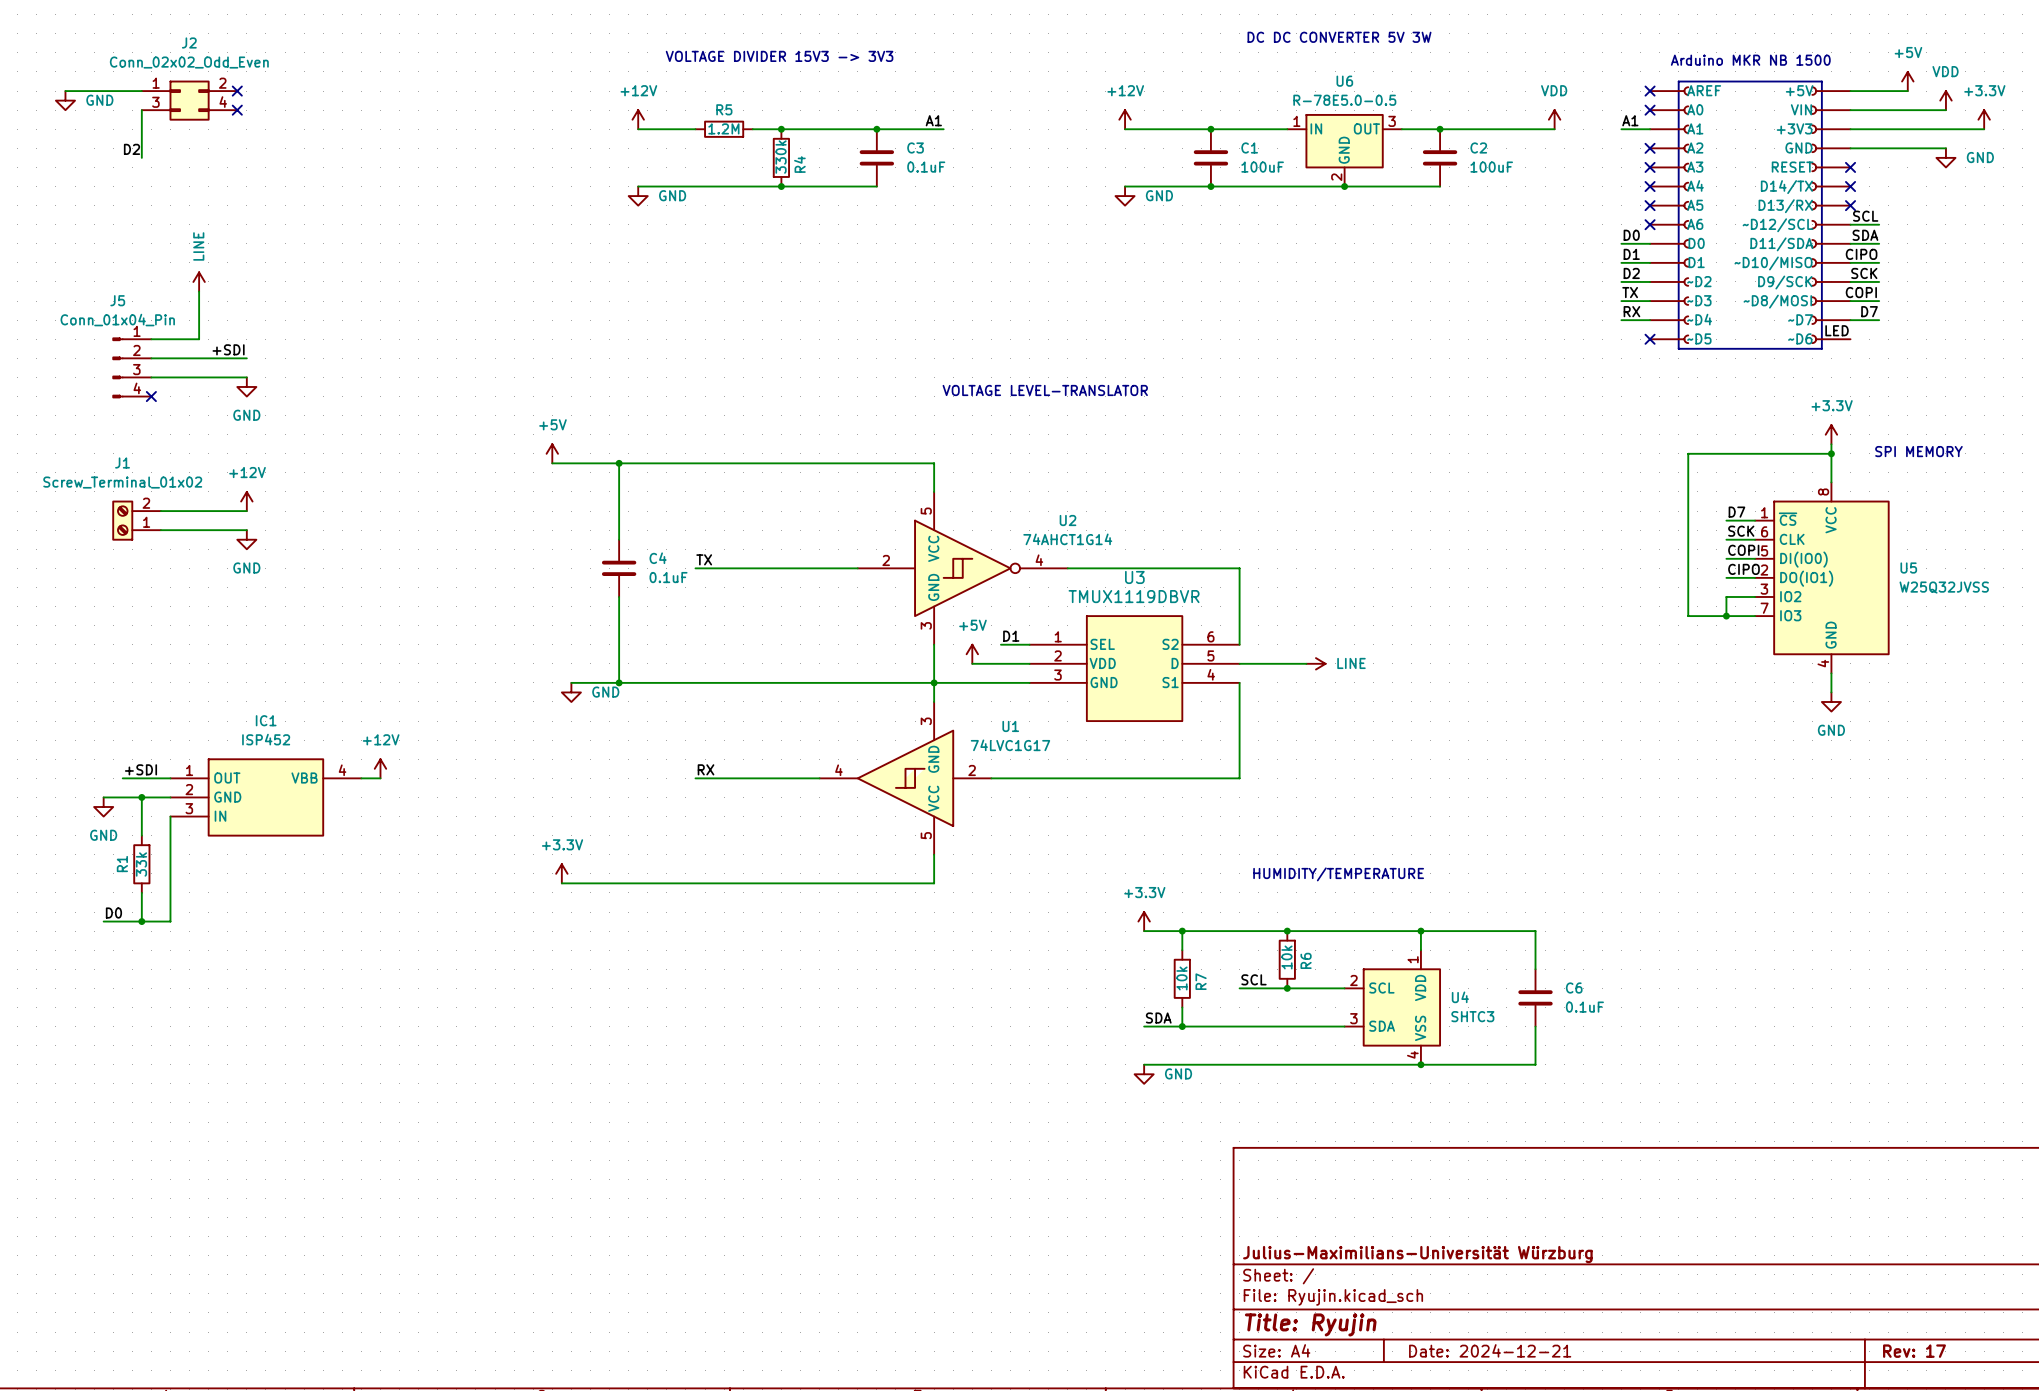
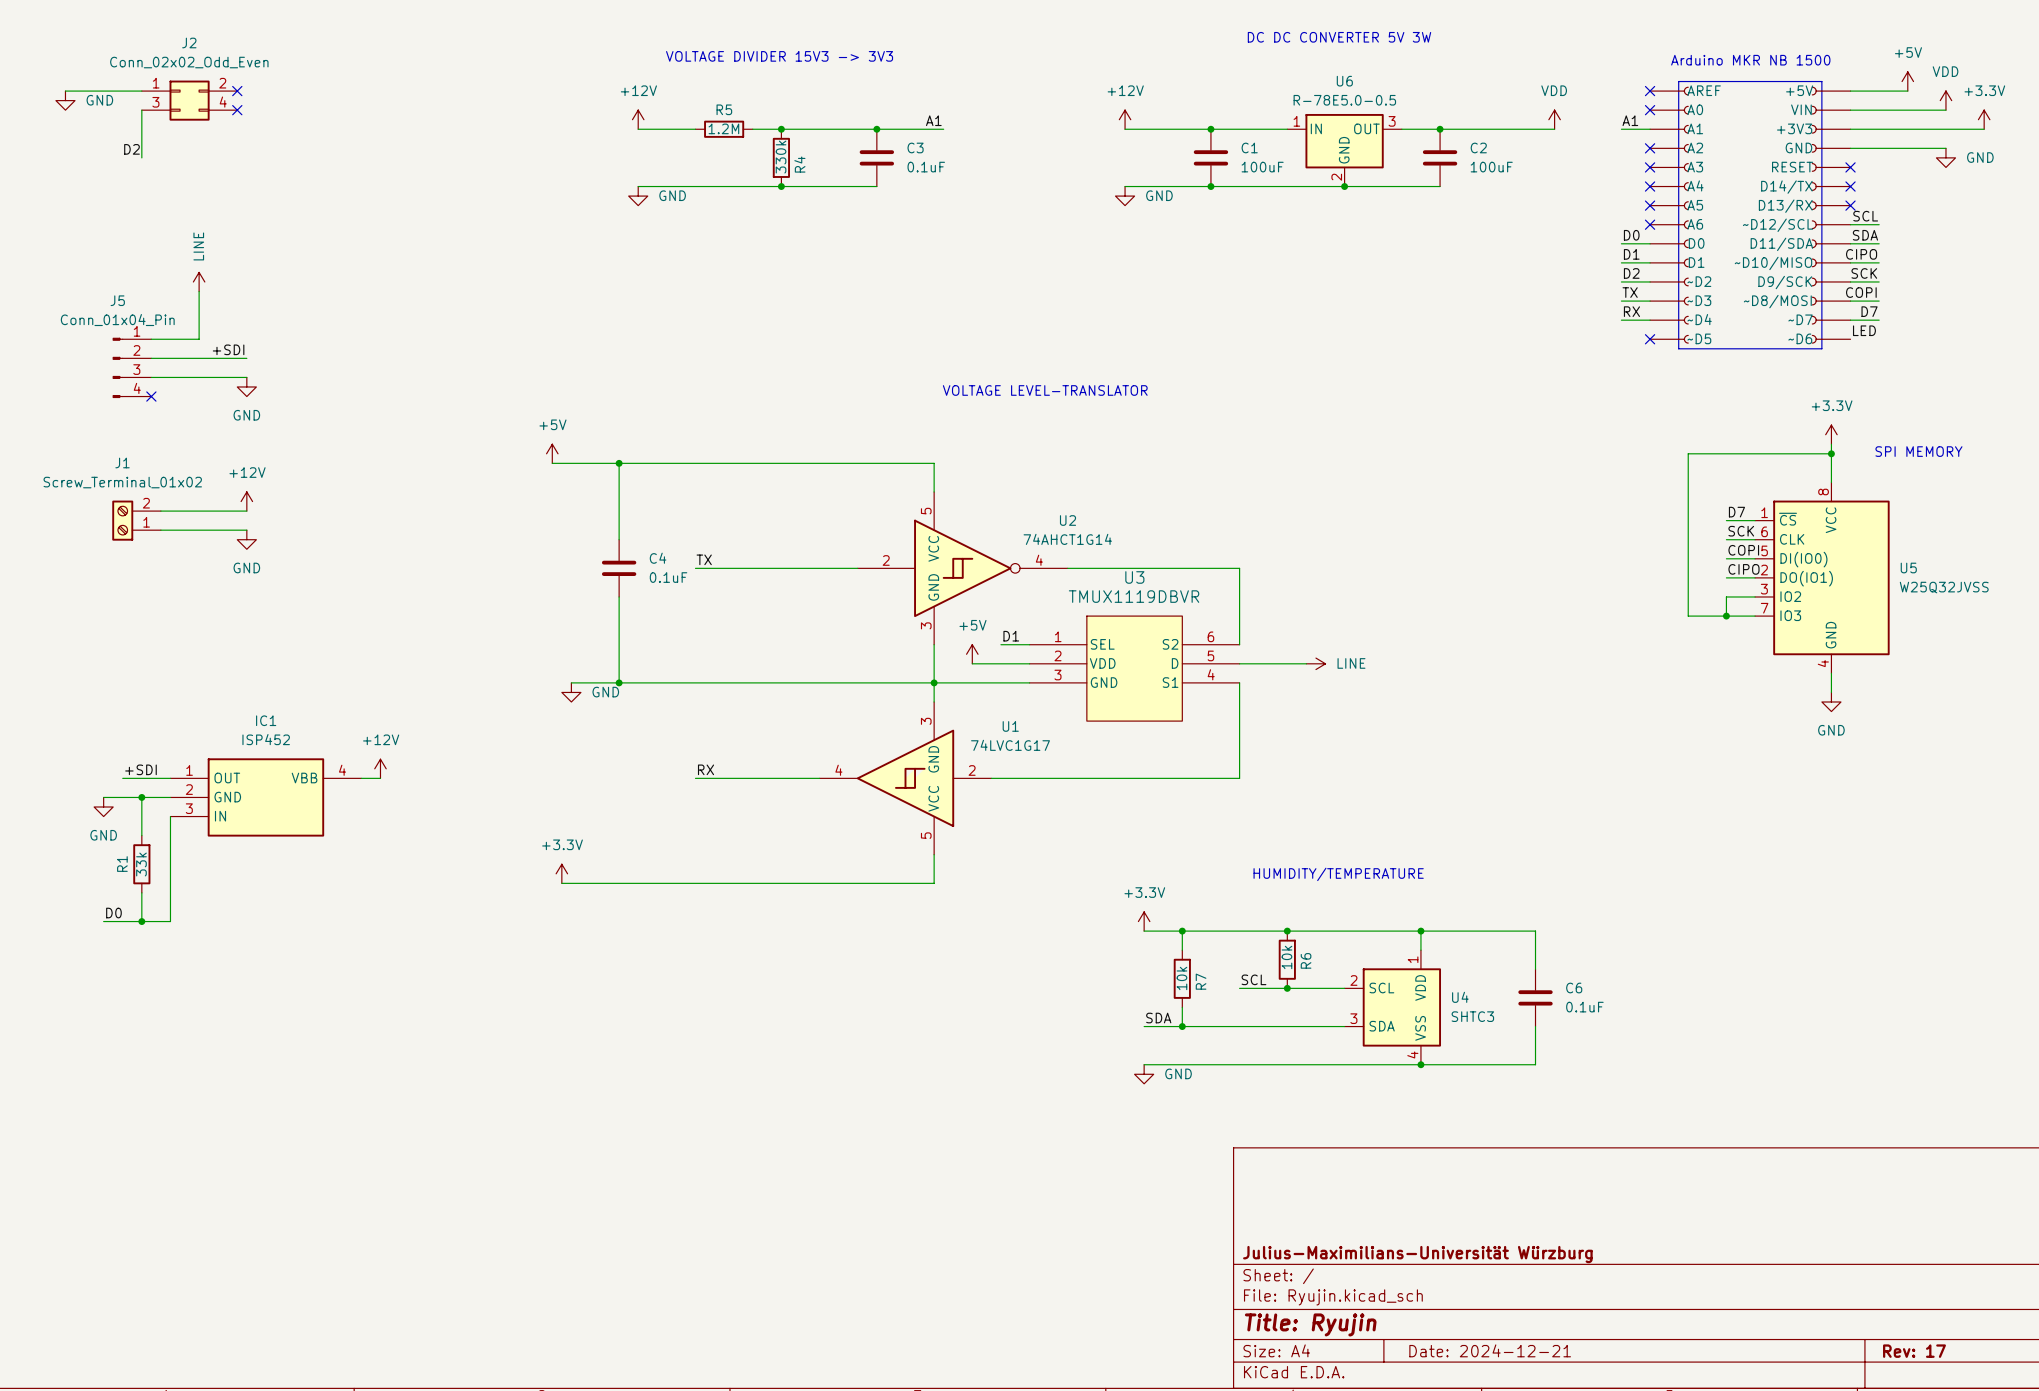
label position: LED (1837, 330) -> LED (1864, 330)

